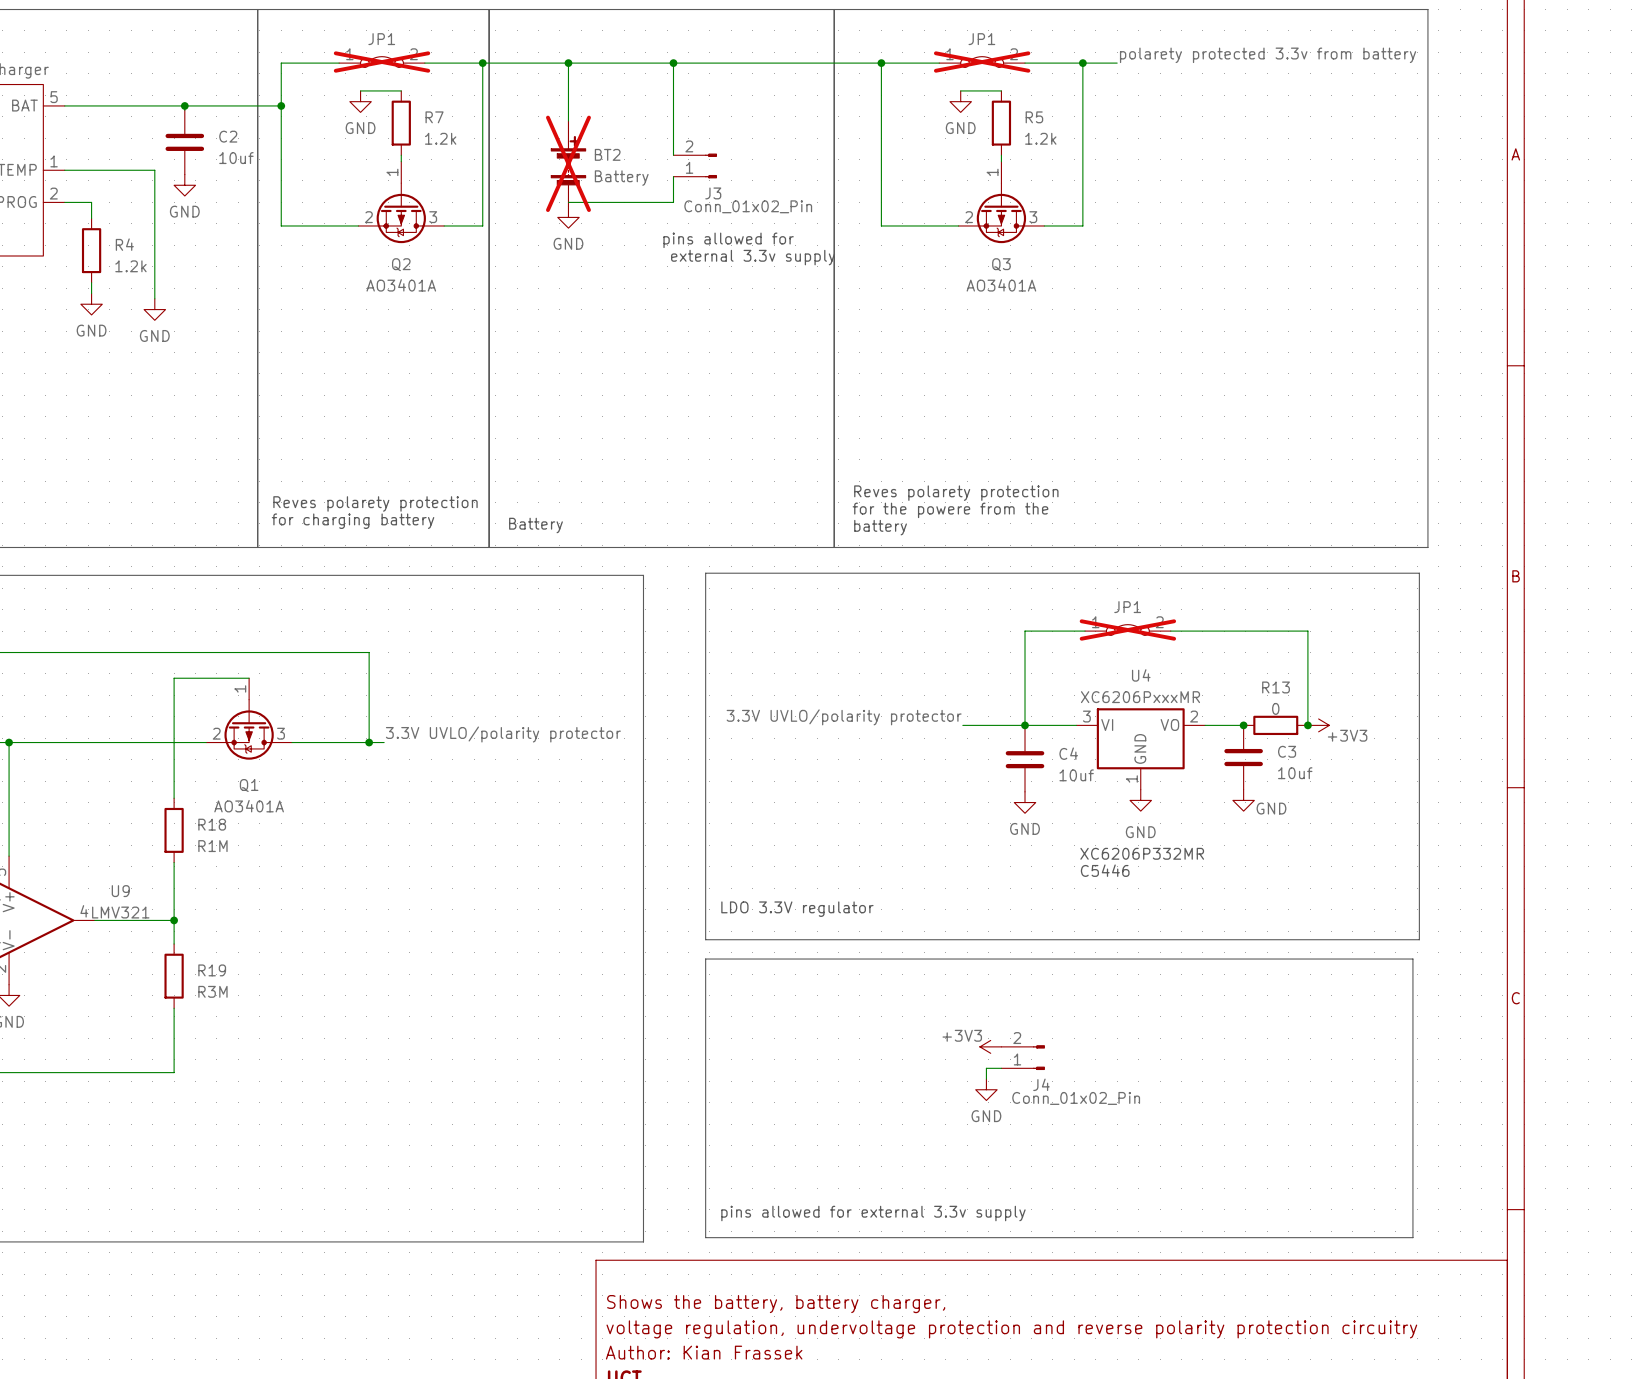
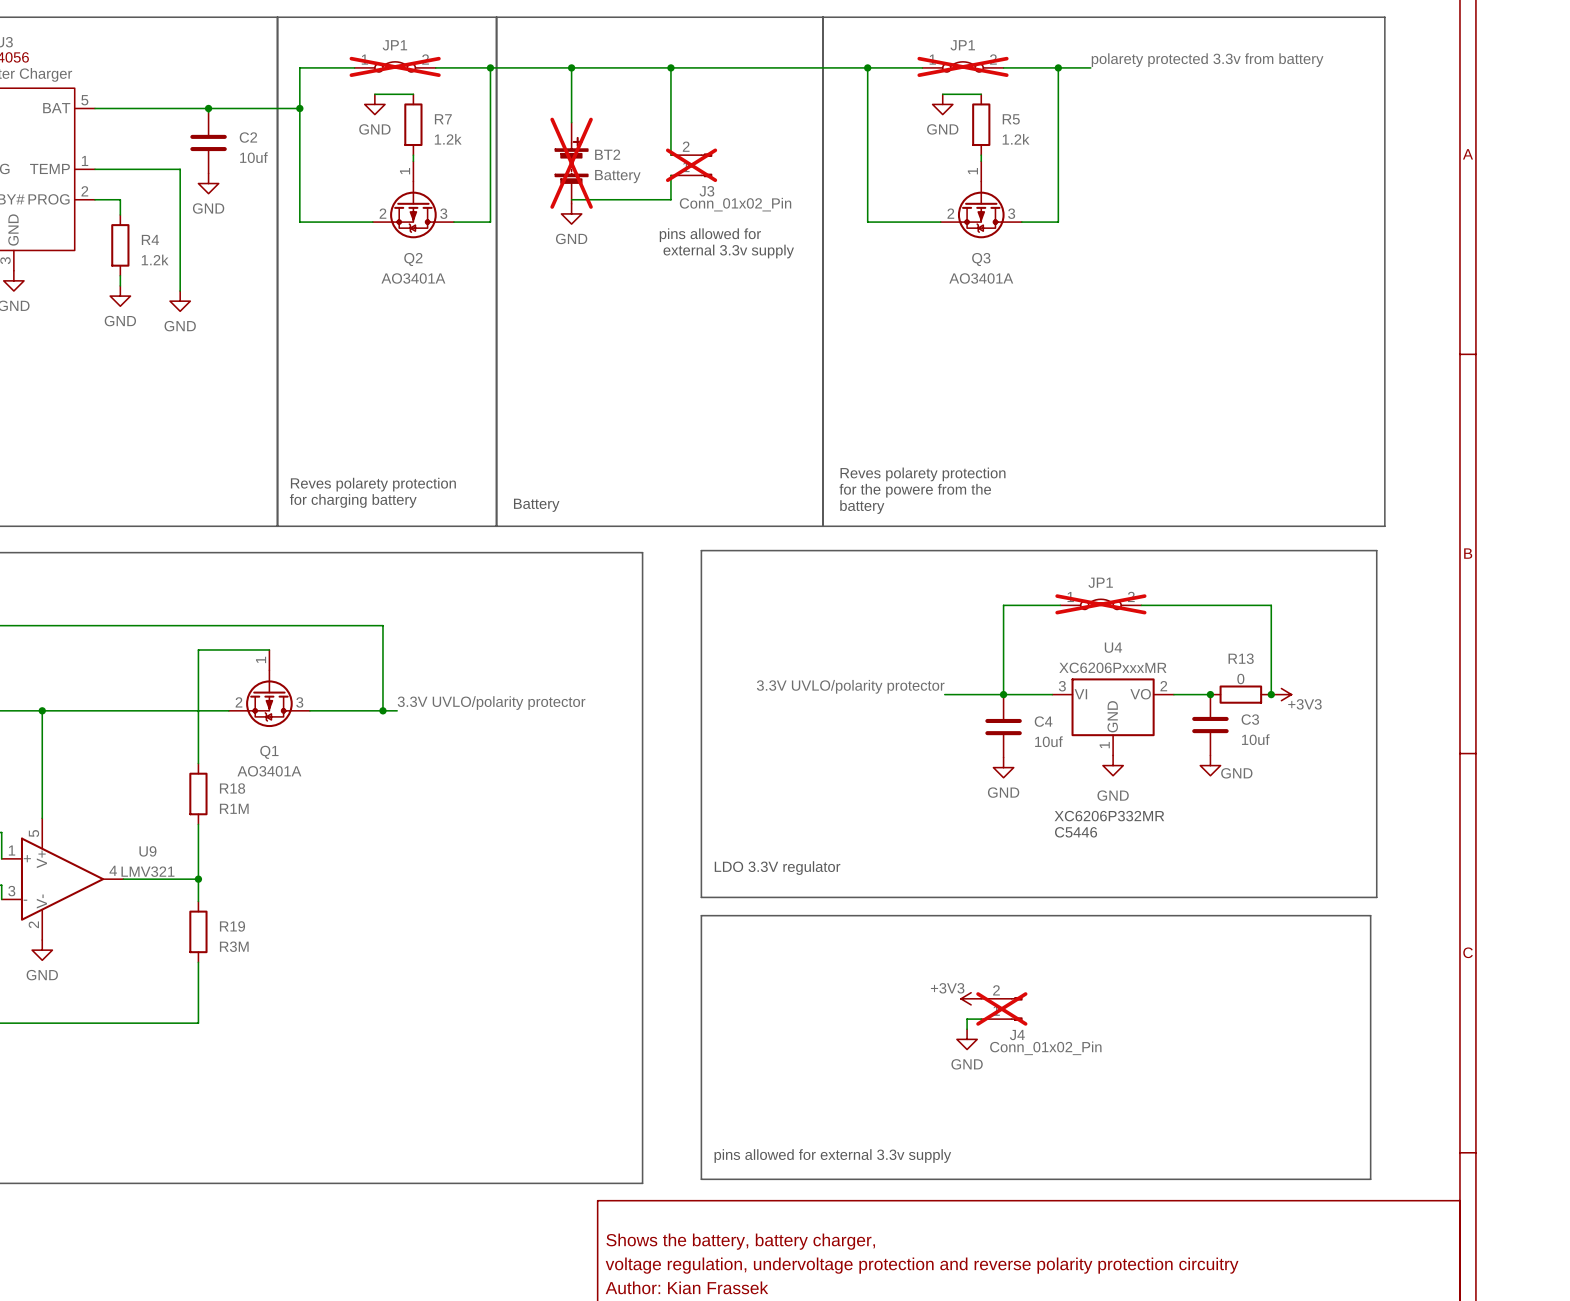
J3 do-not-place cross: none -> (691, 165)
J4 do-not-place cross: none -> (1001, 1008)

